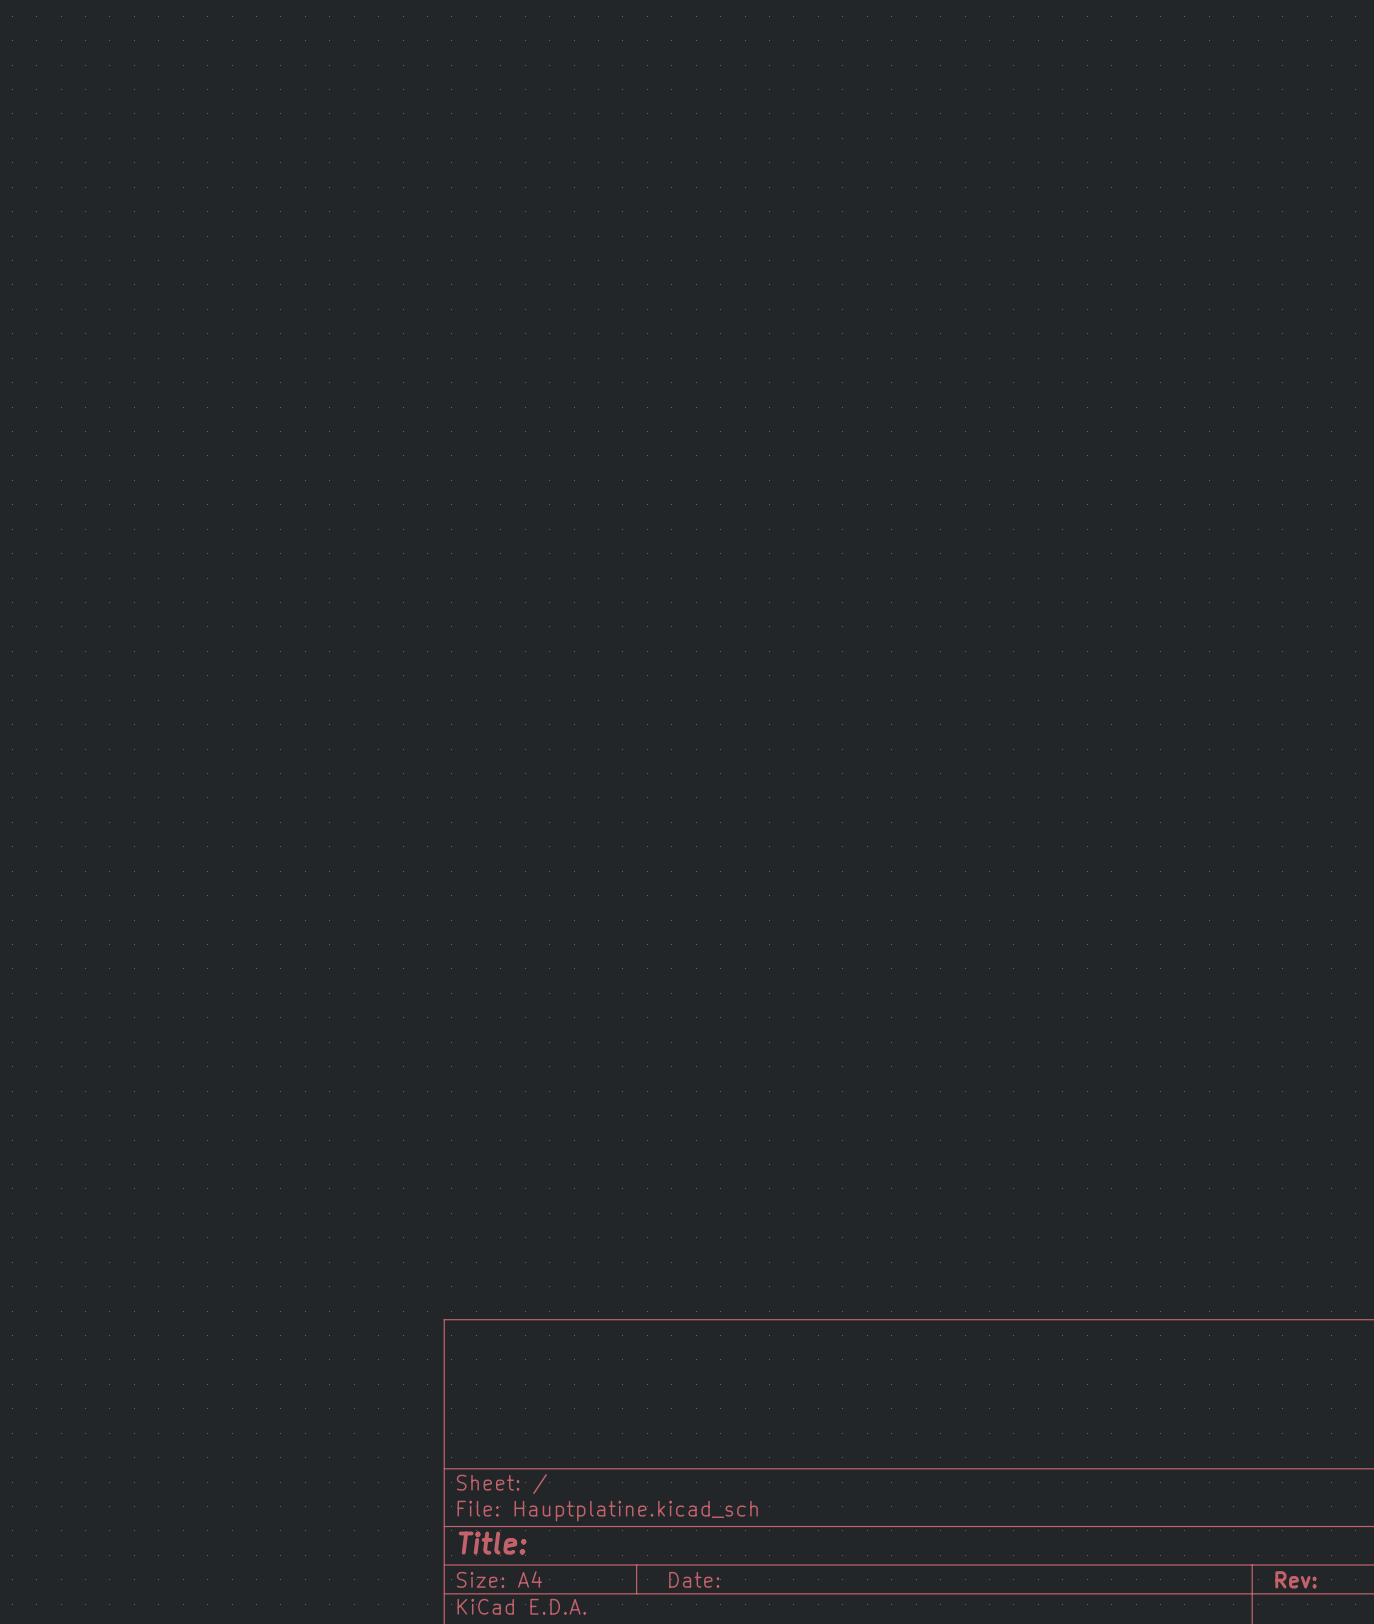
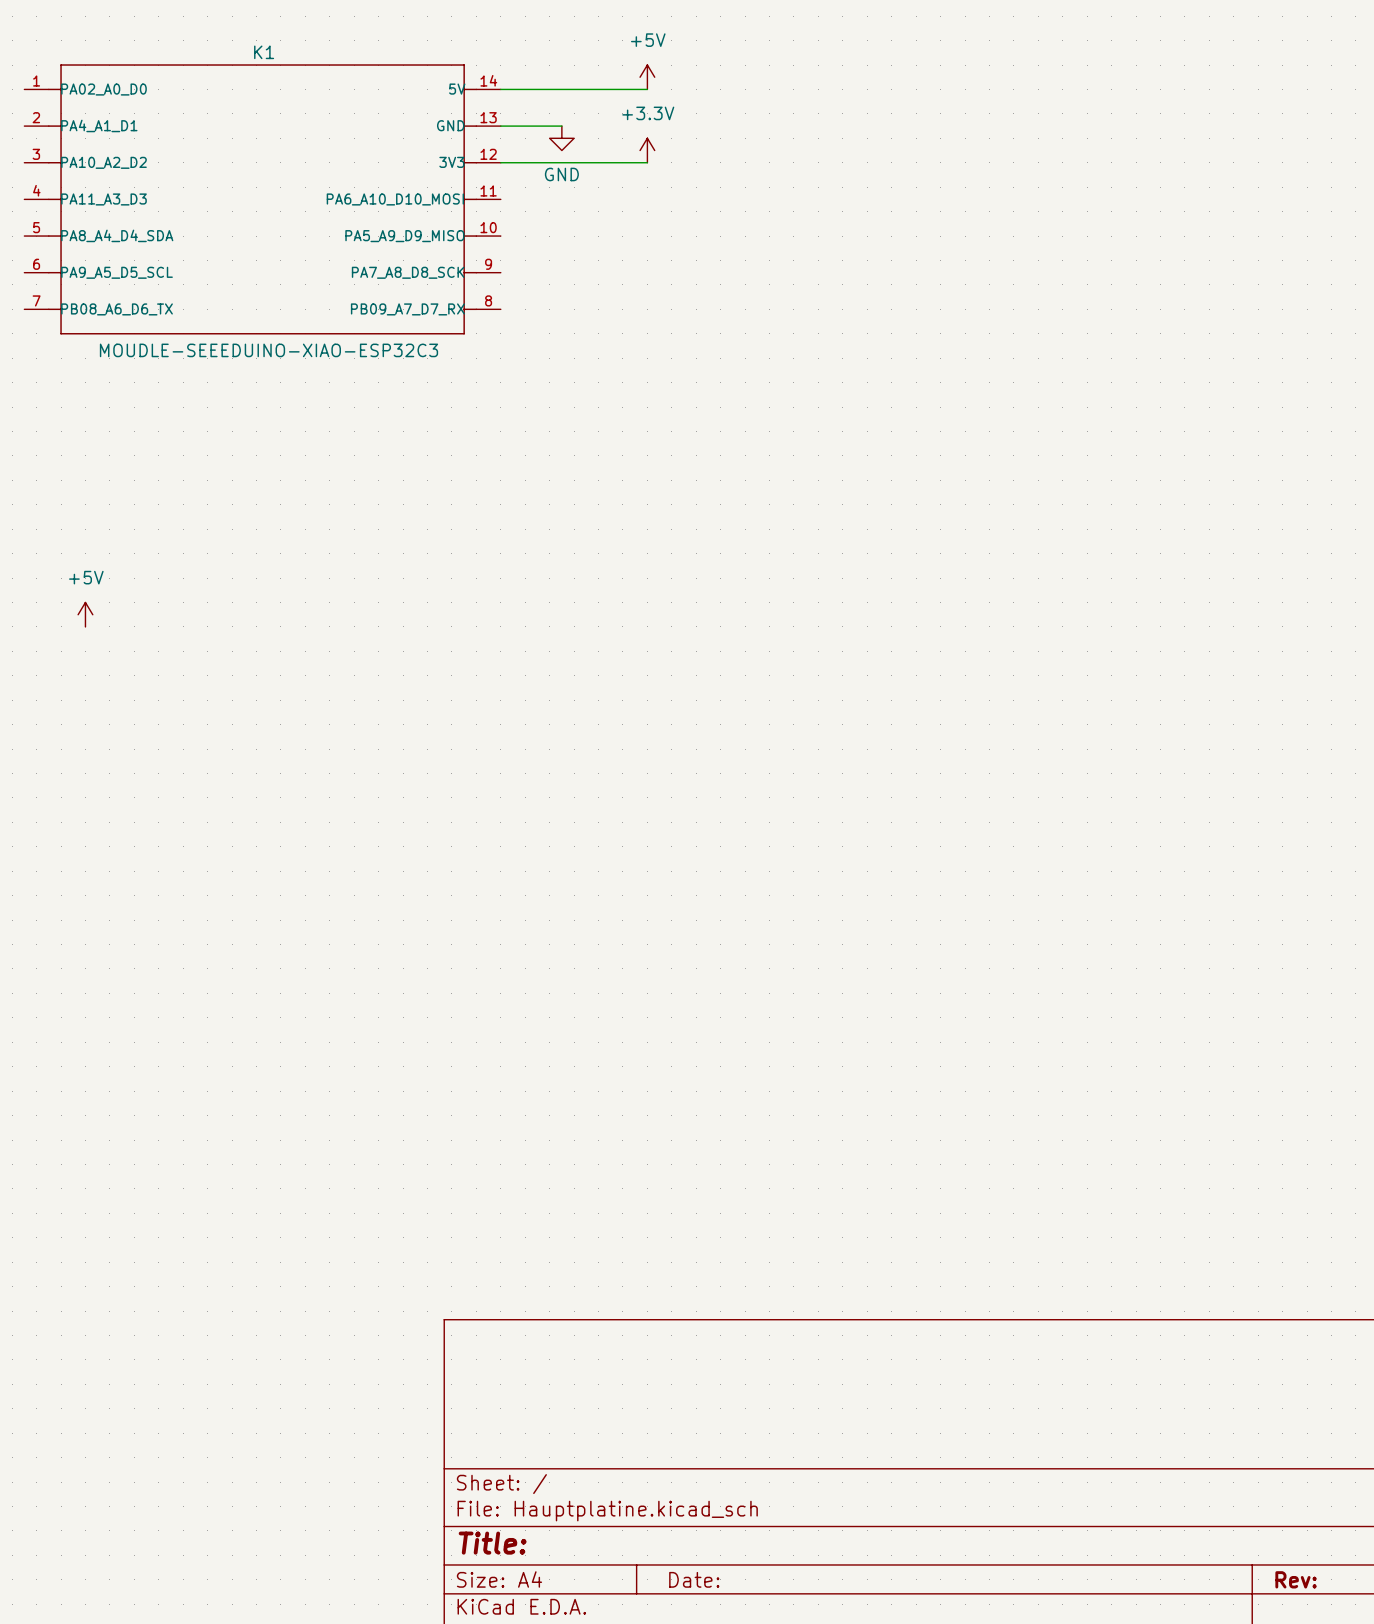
power symbol: none -> +5V (647, 77)
wire: none -> (500, 89) (647, 89)
wire: none -> (500, 126) (561, 126)
power symbol: none -> GND (561, 138)
power symbol: none -> +3.3V (647, 150)
wire: none -> (500, 162) (647, 162)
K1: none -> MOUDLE-SEEEDUINO-XIAO-ESP32C3 (262, 199)
power symbol: none -> +5V (85, 614)

